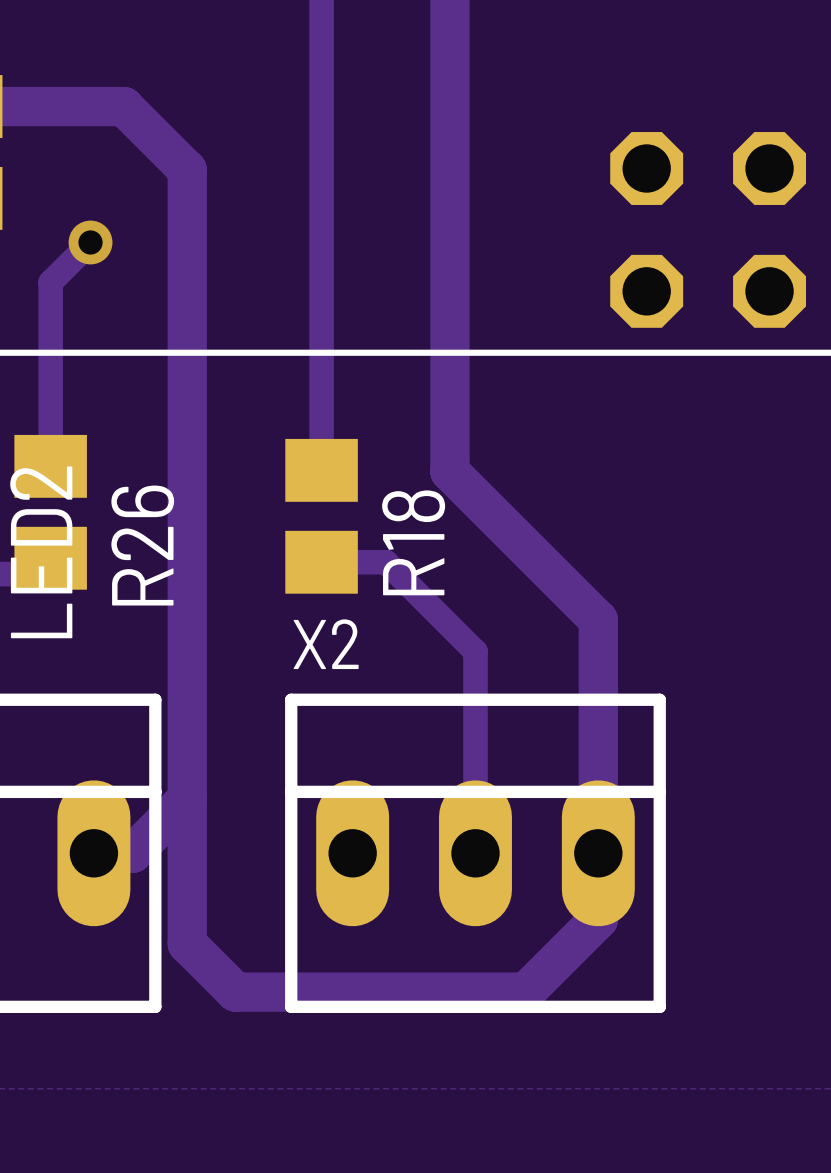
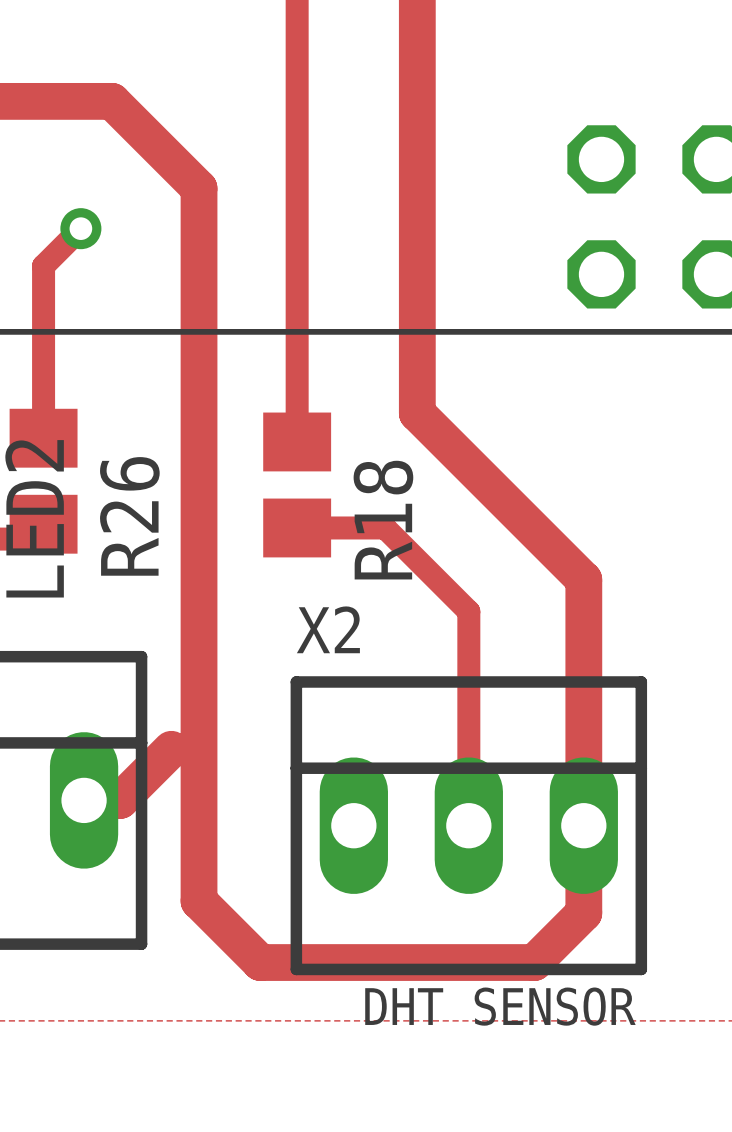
track: (187, 169) (187, 943) (235, 992) (525, 992) (598, 919) (598, 620) (449, 471) (449, 439) -> (171, 160) (199, 188) (199, 901) (260, 962) (534, 962) (583, 913) (583, 579) (417, 413)
track: (386, 562) (475, 651) (475, 853) -> (357, 527) (385, 527) (468, 611) (468, 825)
X2 position: (475, 853) -> (468, 825)
text: none -> DHT SENSOR (500, 1006)

